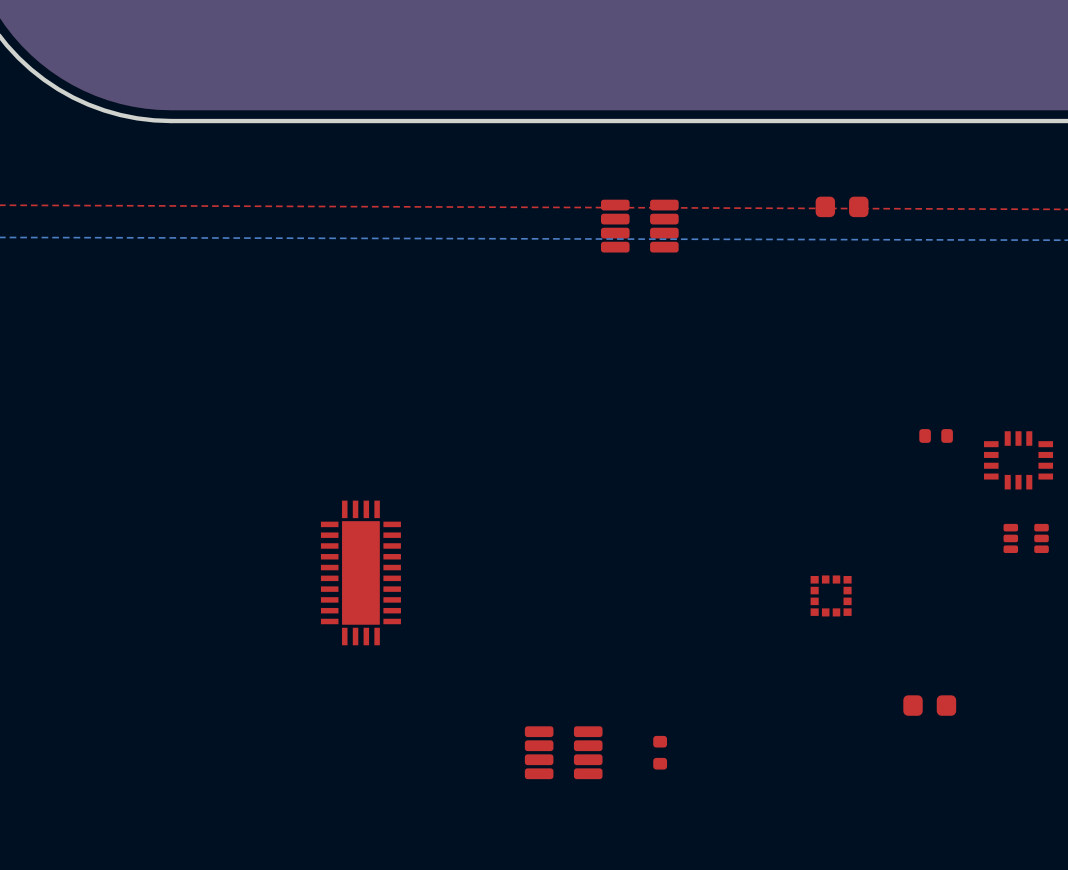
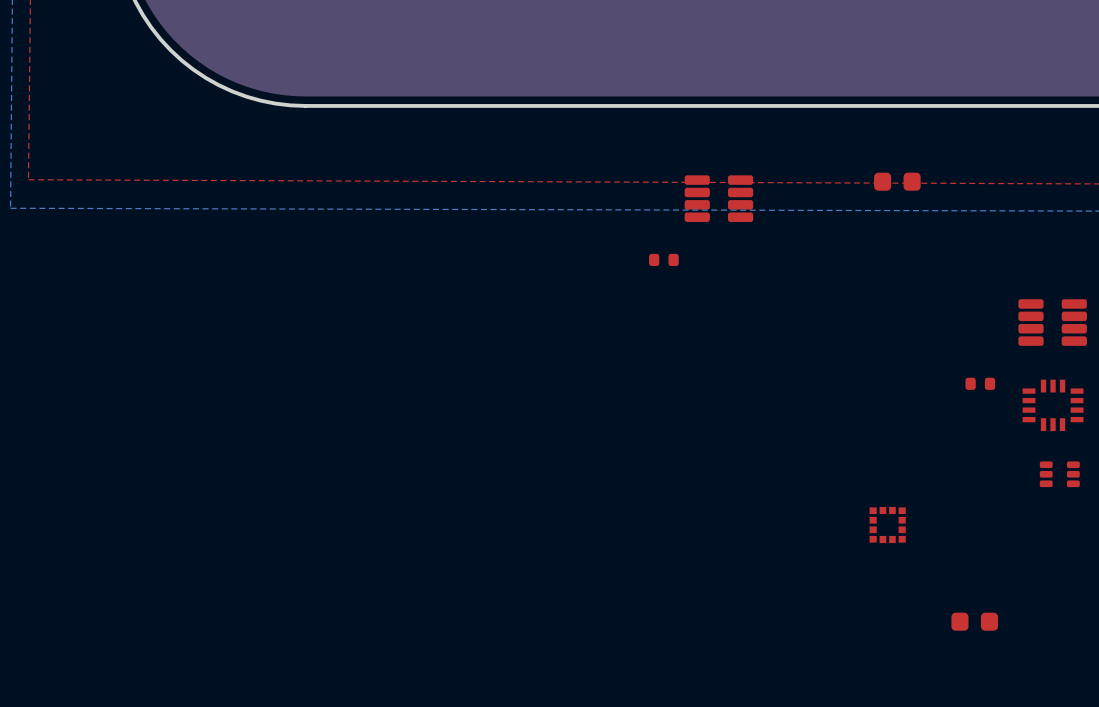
part: none -> (1052, 322)
part: (360, 572) -> none
part: (563, 752) -> none
part rotation: 0° (660, 752) -> 90° clockwise (663, 259)
part position: (660, 752) -> (663, 259)

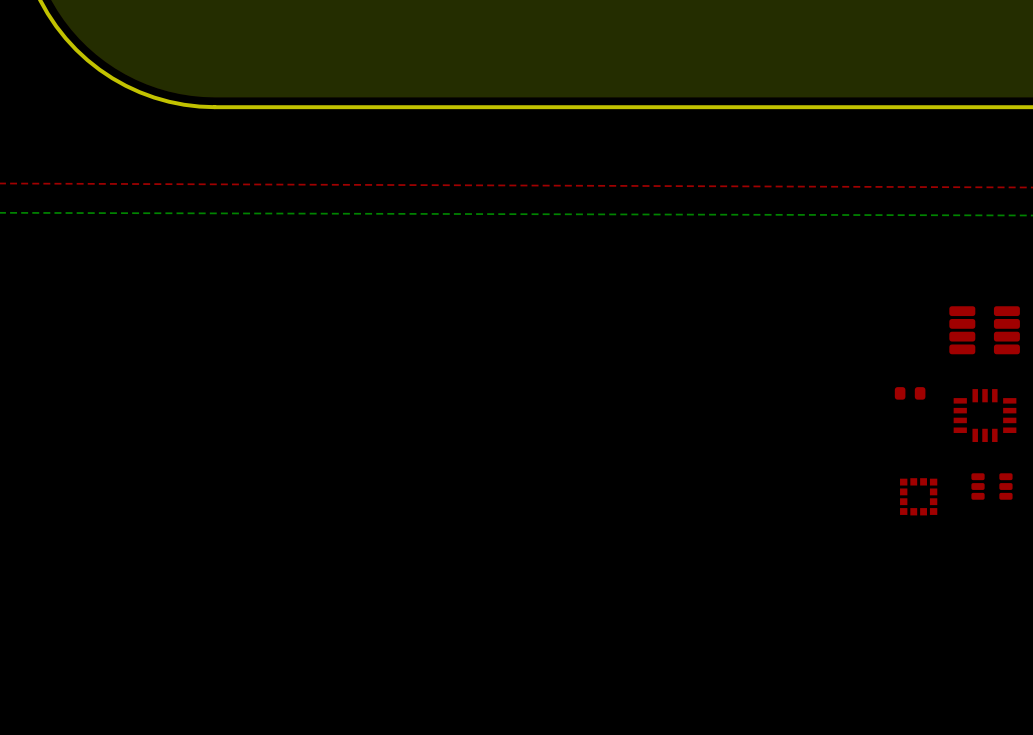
part: (897, 181) -> none
part: (718, 198) -> none
part: (663, 259) -> none
part position: (887, 525) -> (918, 496)
part: (974, 621) -> none

